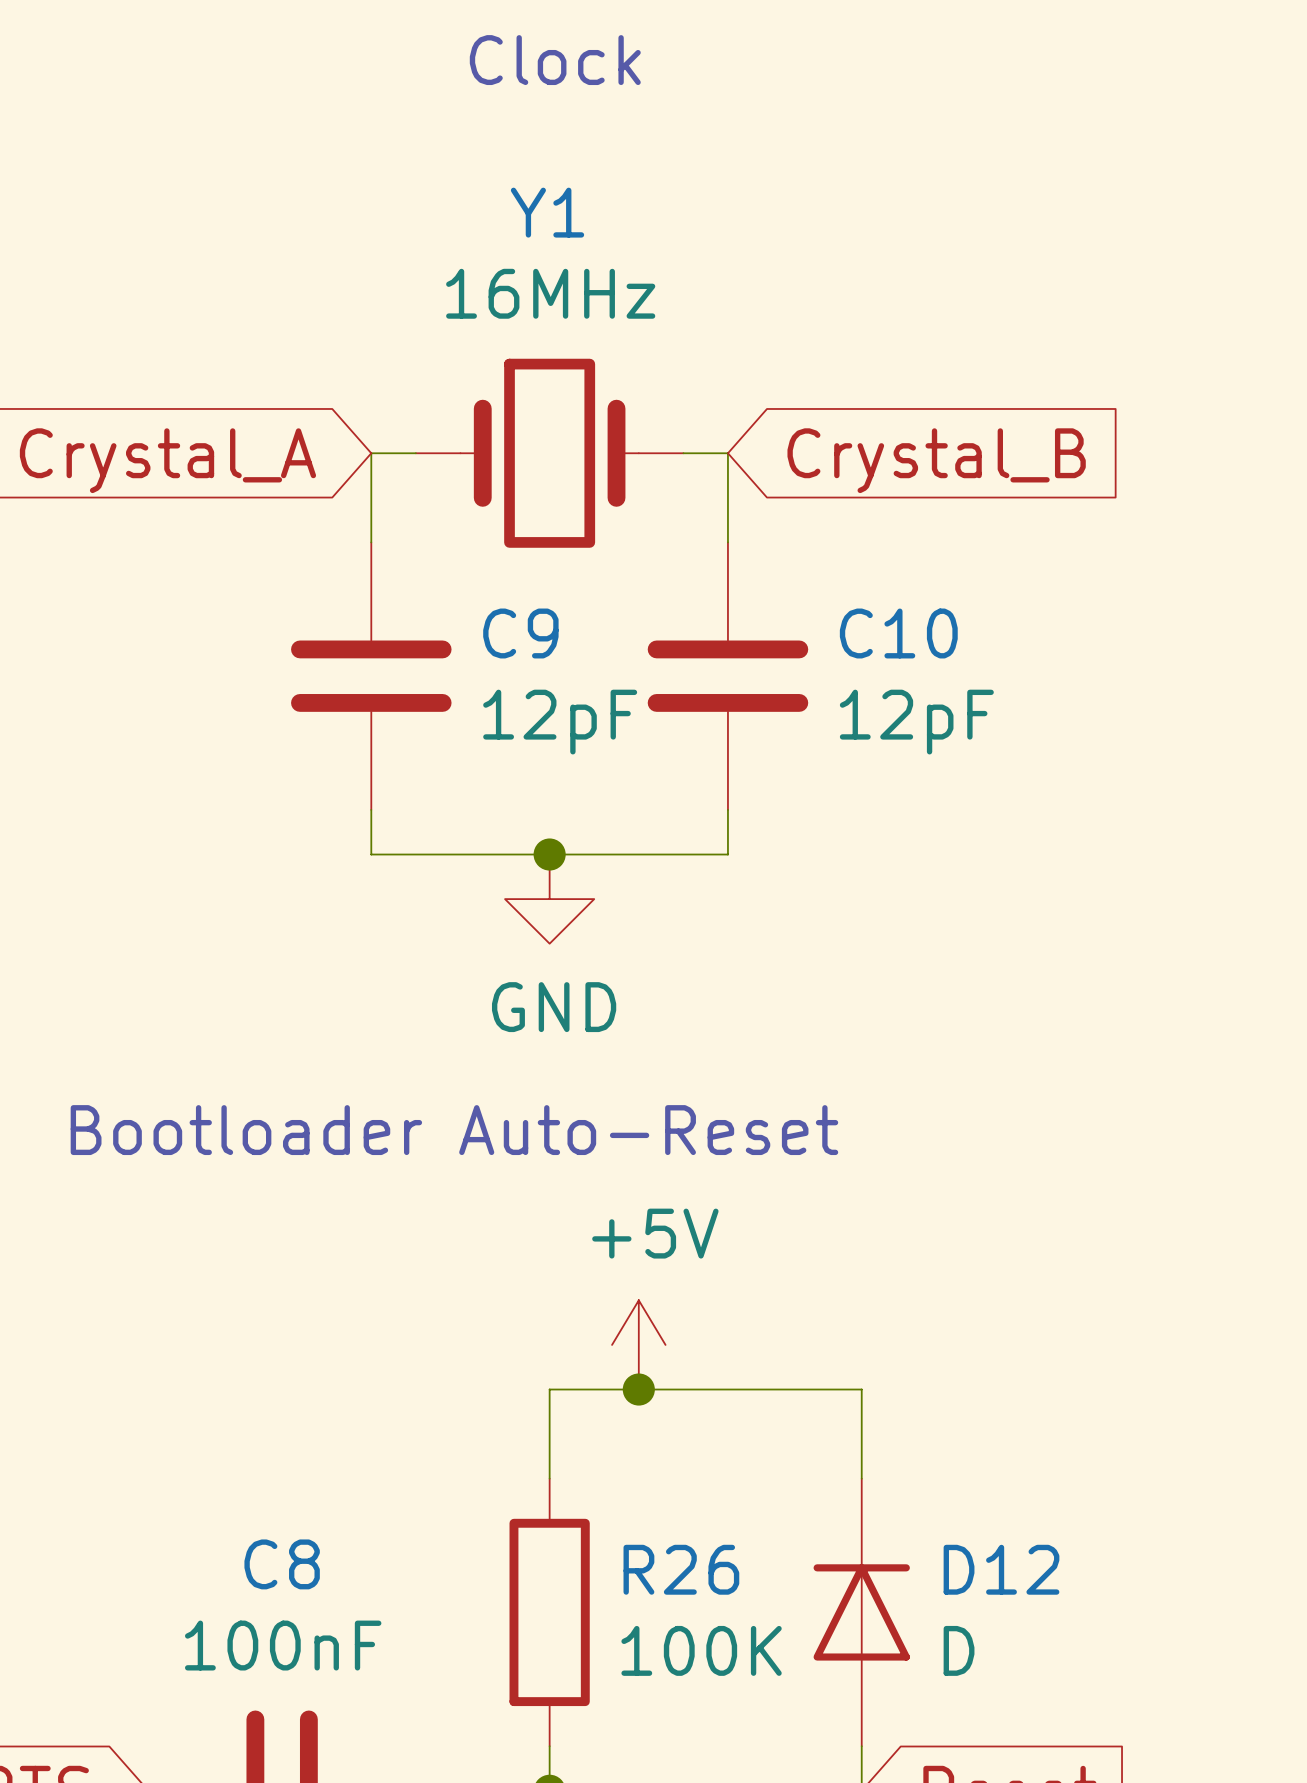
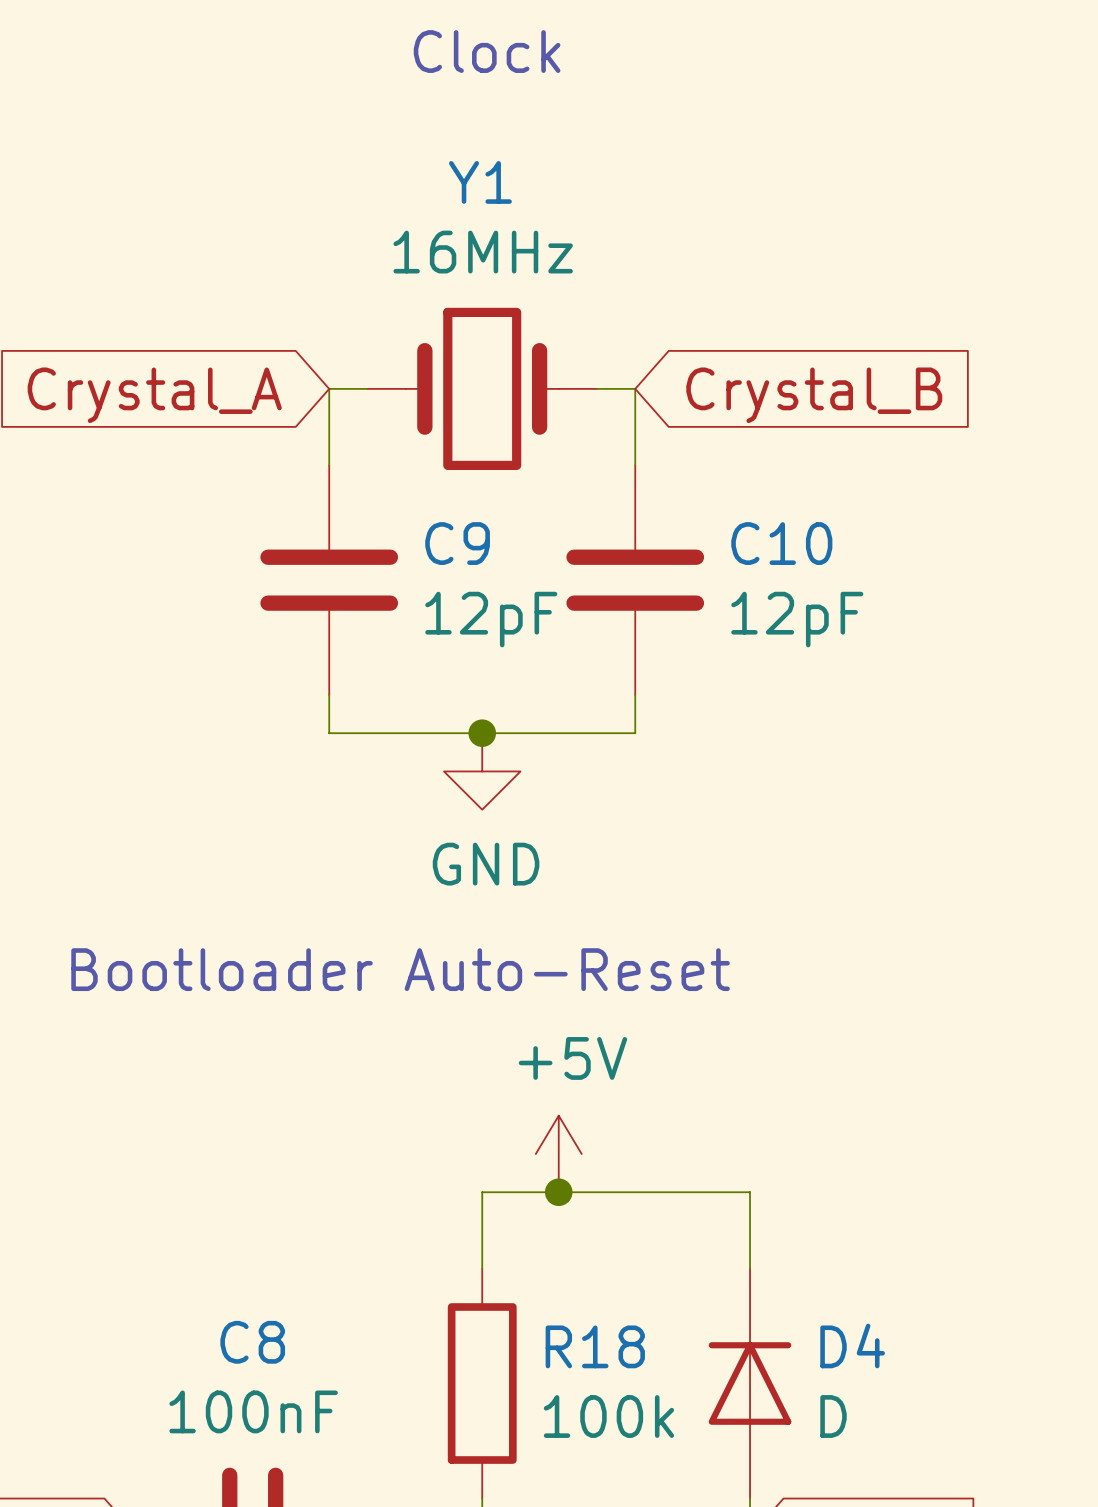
R26 name: R26 (681, 1569) -> R18 (595, 1346)
D12 name: D12 (1001, 1569) -> D4 (852, 1345)
R26 value: 100K (701, 1650) -> 100k (608, 1416)

